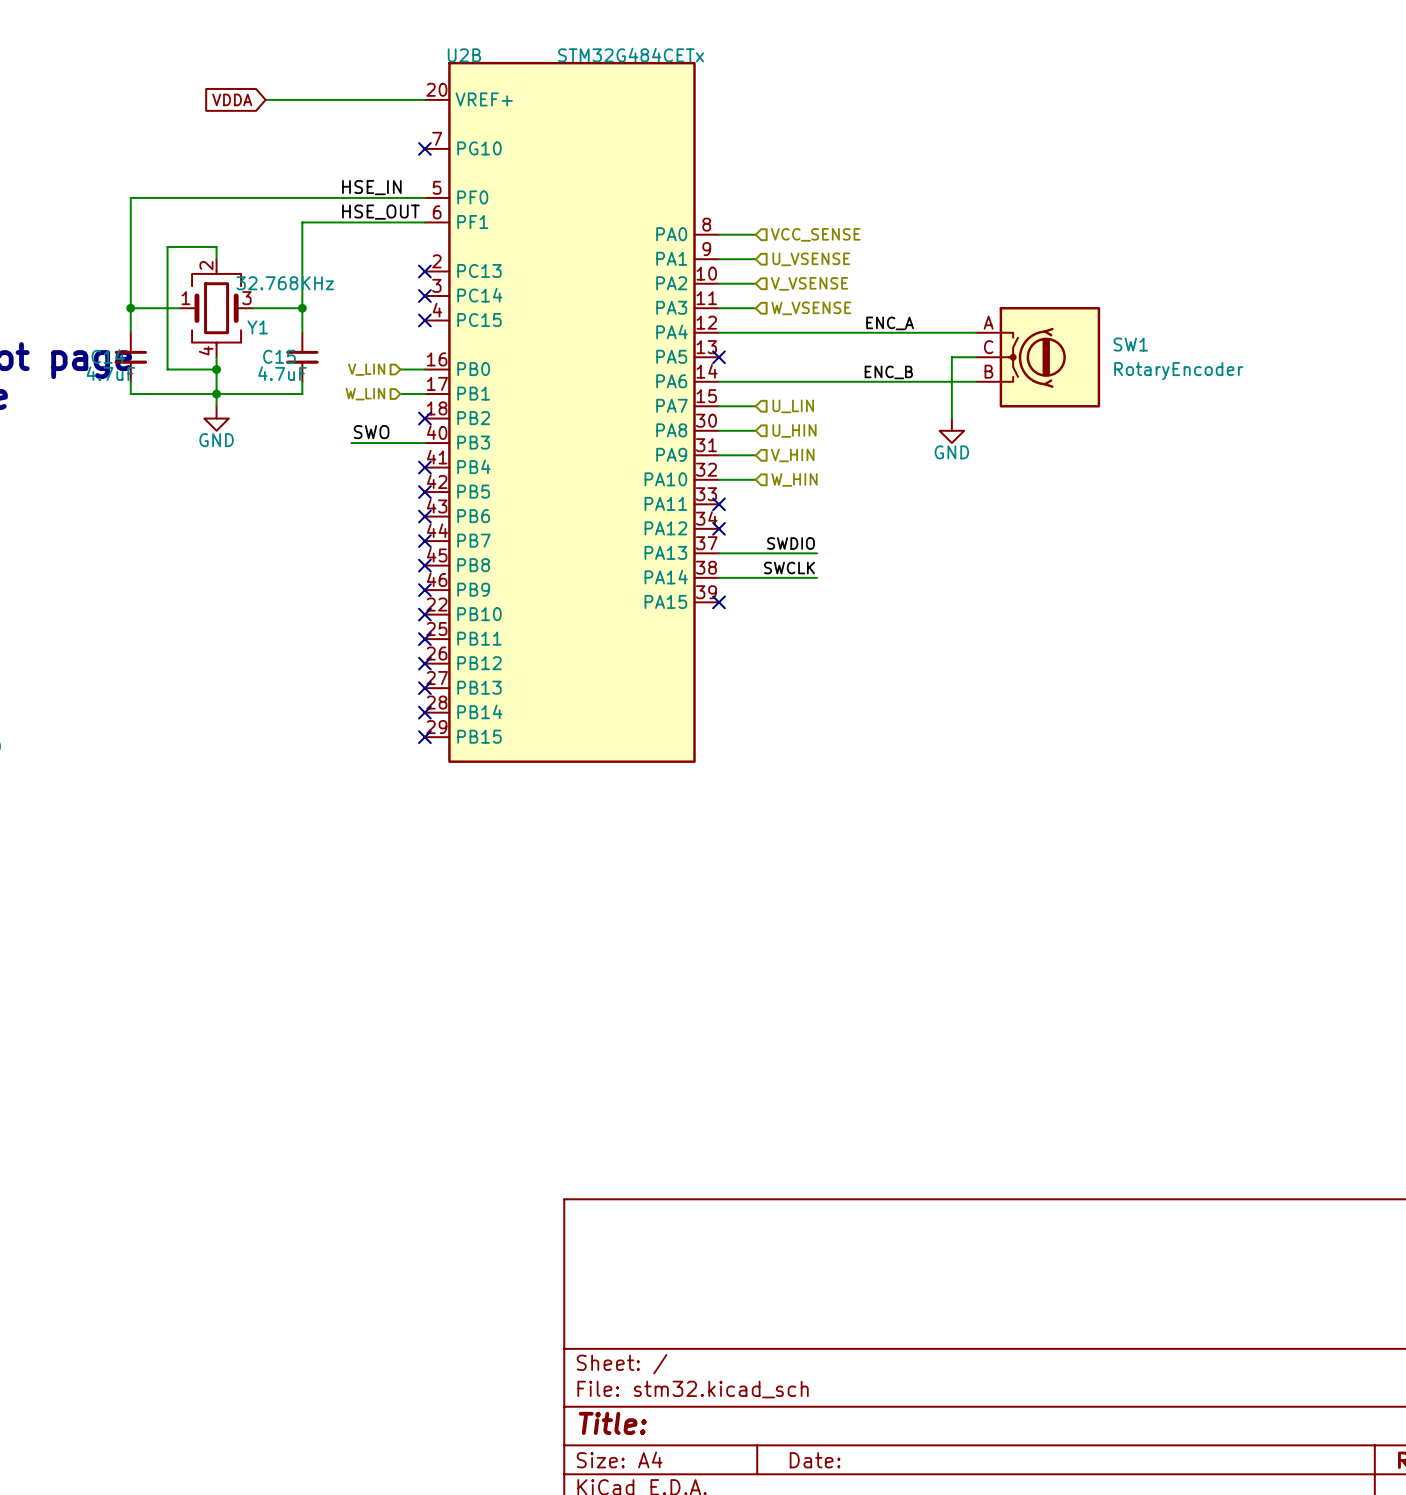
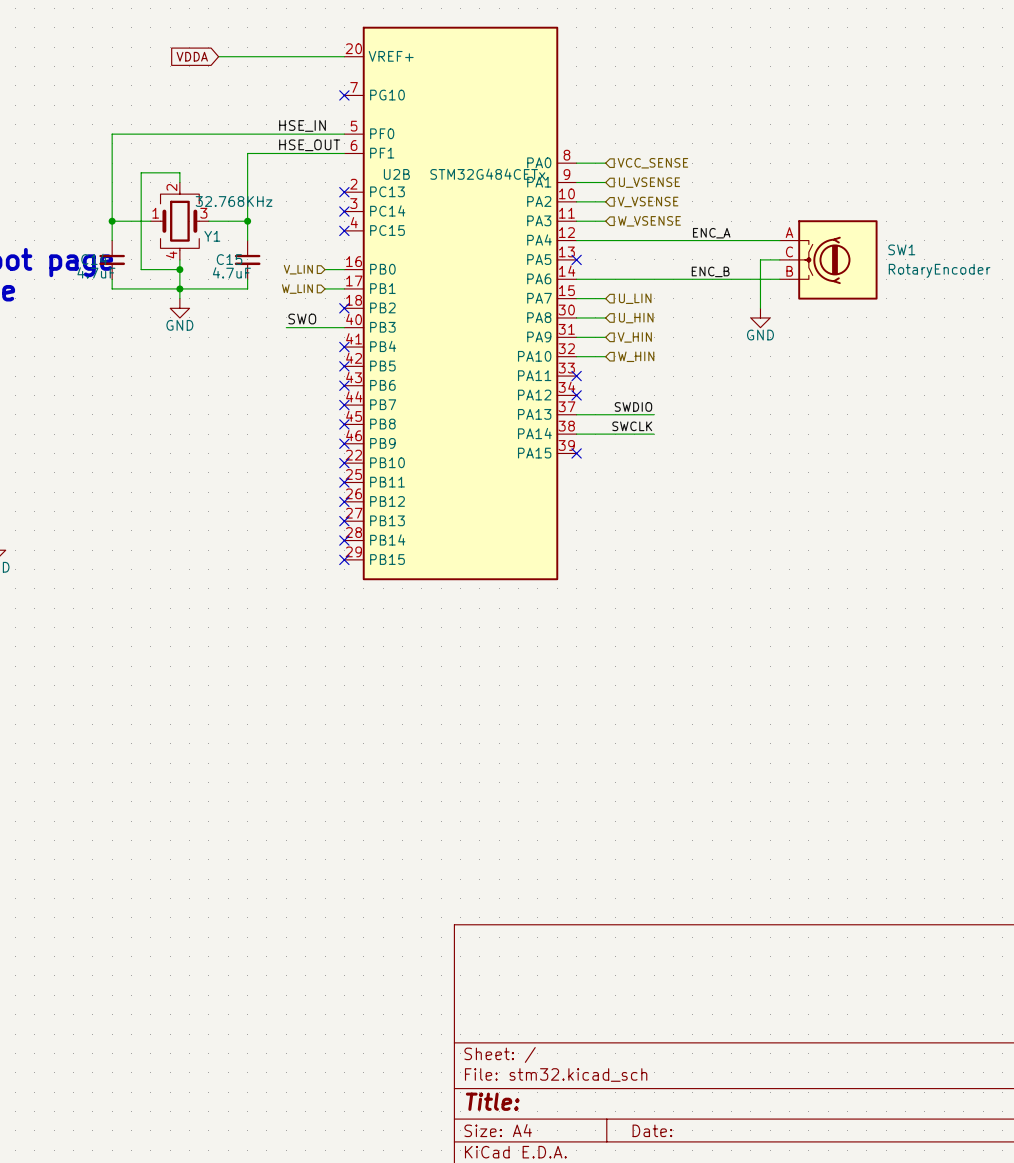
U2B name position: U2B (464, 55) -> U2B (396, 174)
U2B value position: STM32G484CETx (631, 55) -> STM32G484CETx (487, 174)

